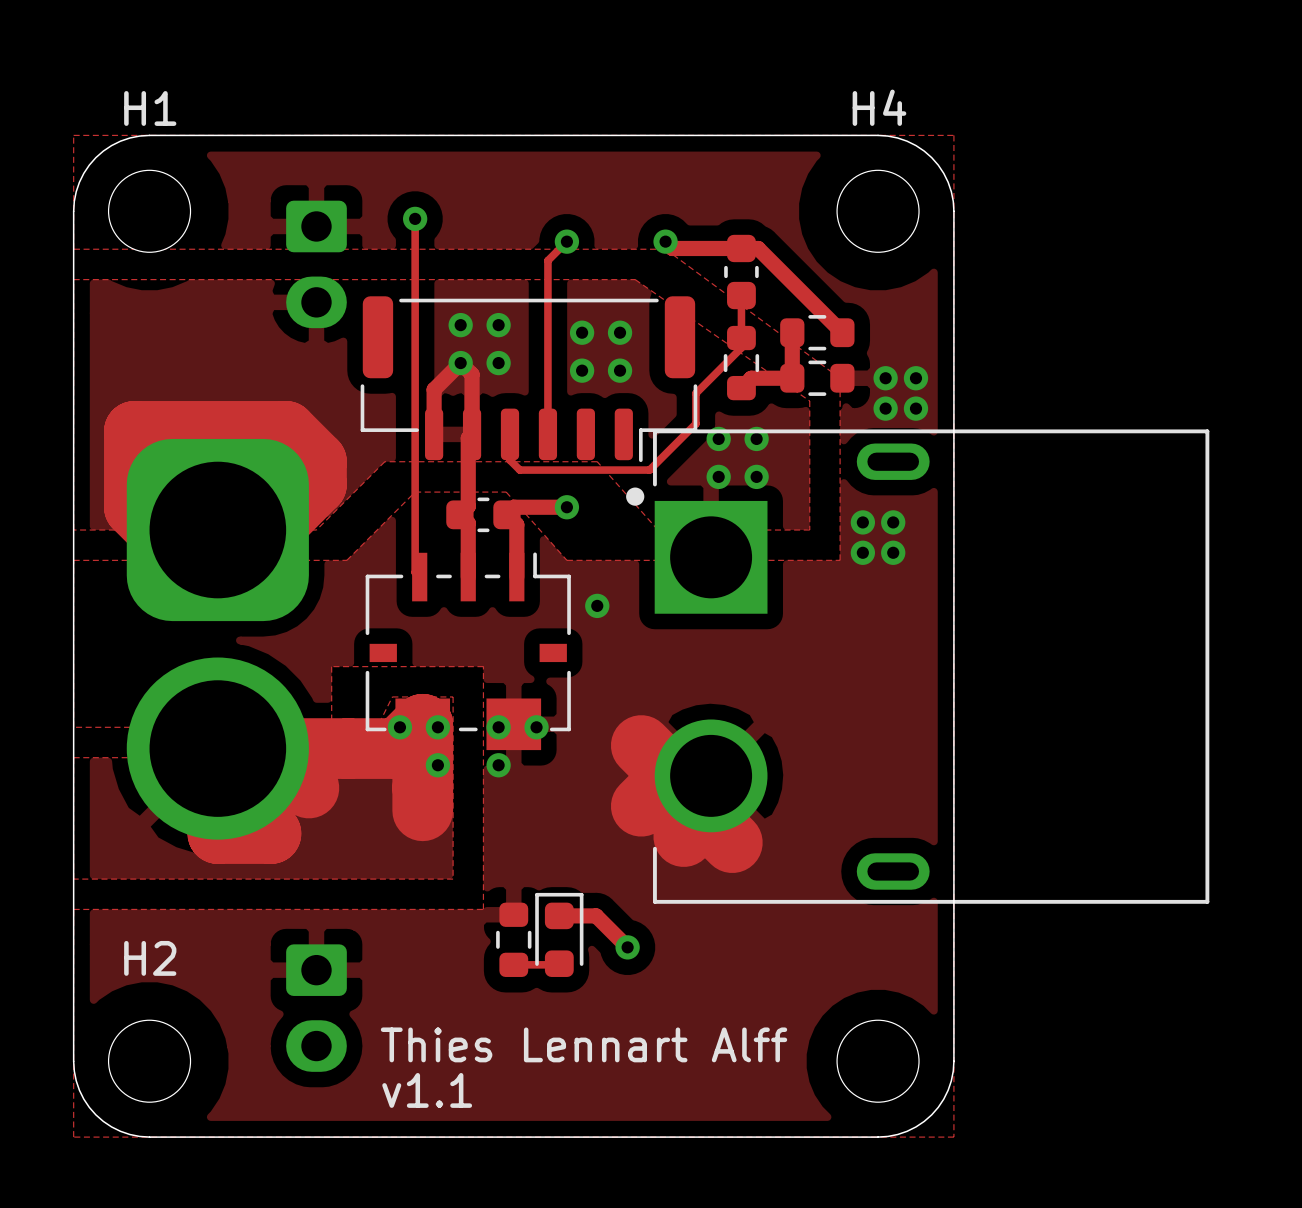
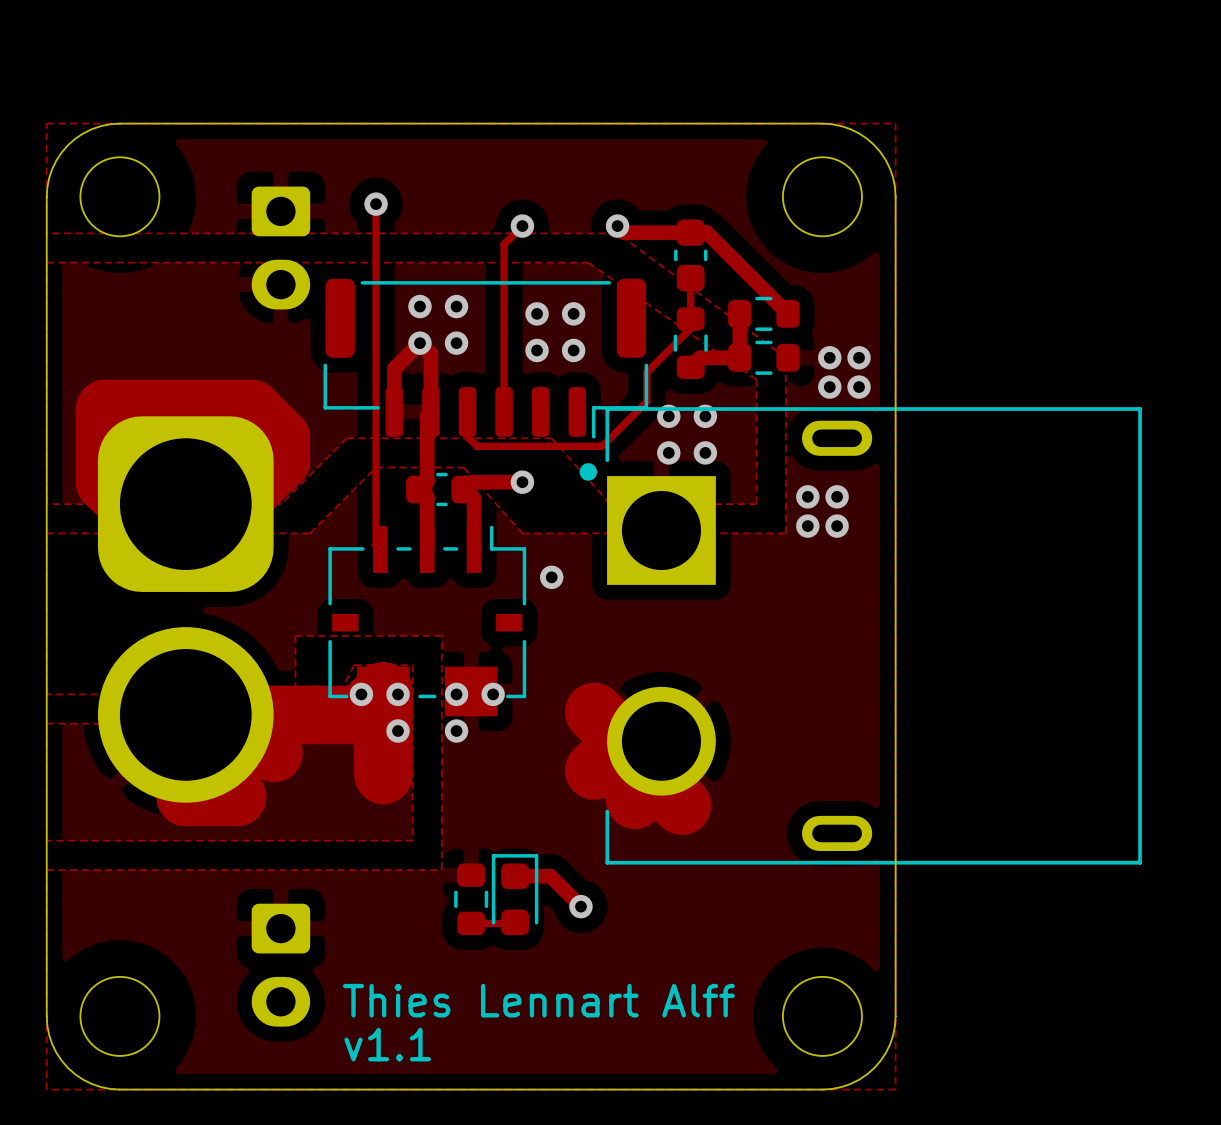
H4 name: H4 (879, 107) -> none
H1 name: H1 (150, 108) -> none
H2 name: H2 (150, 958) -> none

